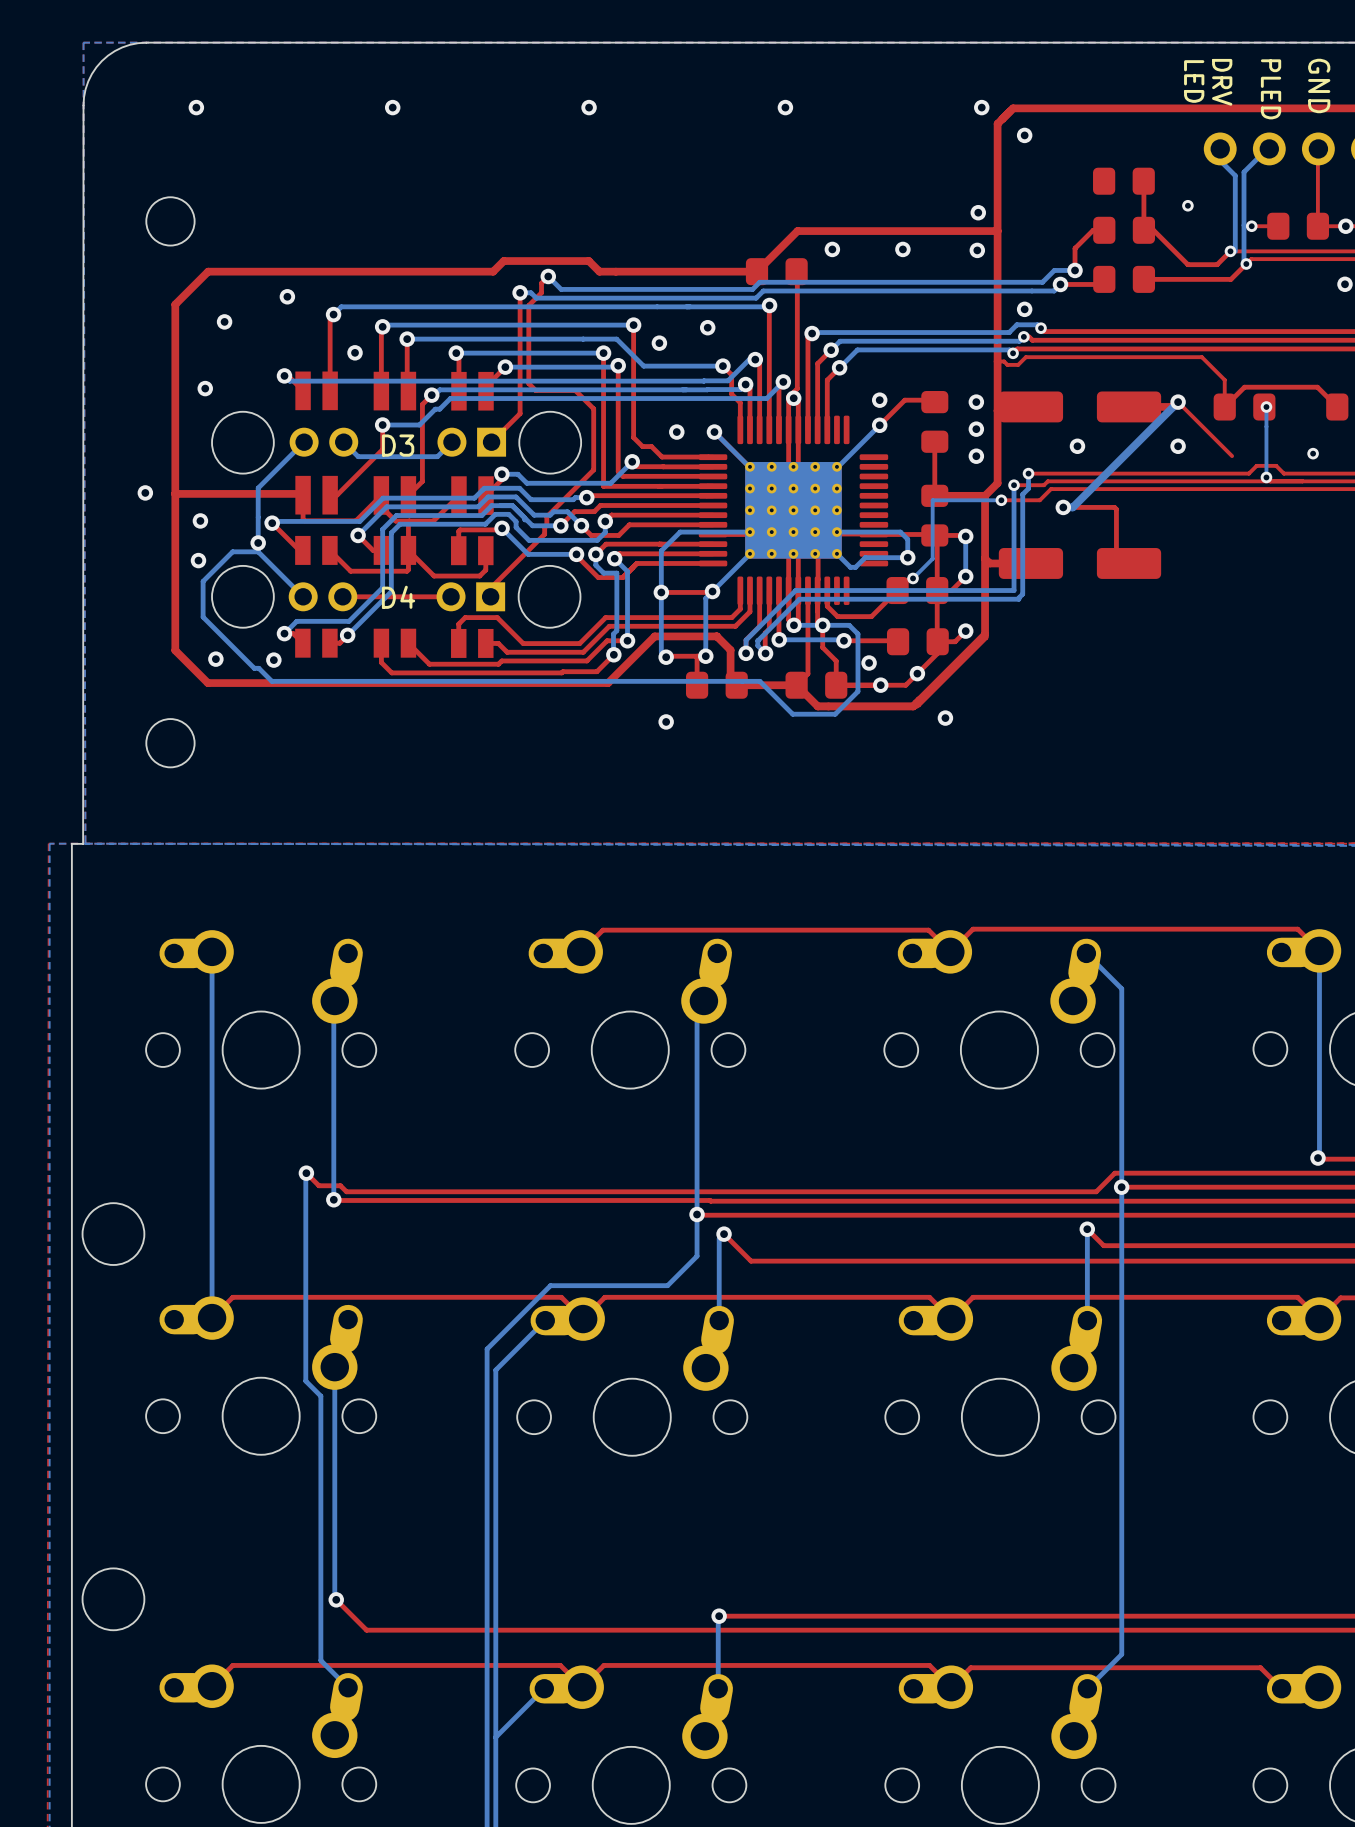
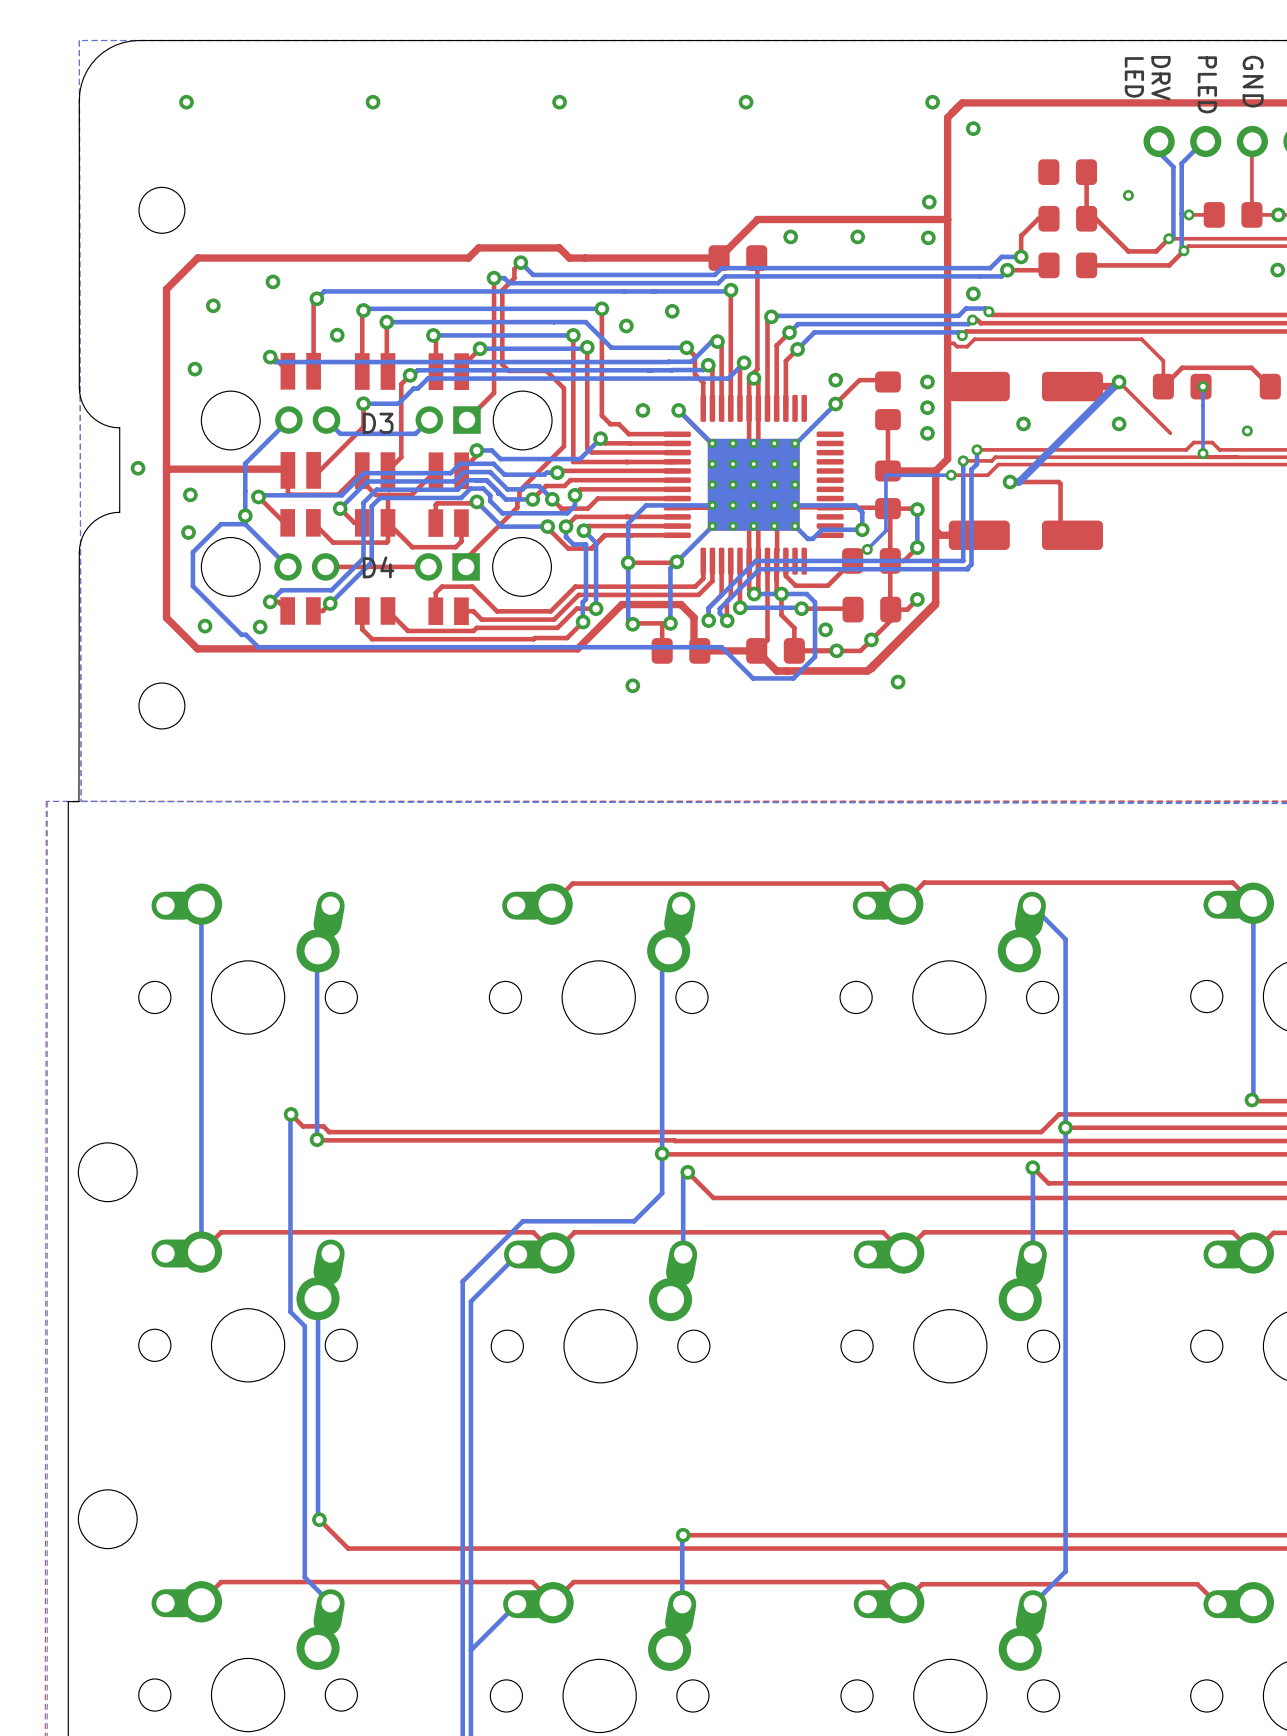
board edge: (83, 105) (83, 843) -> (79, 100) (79, 392) (84, 407) (95, 419) (109, 426) (119, 427) (119, 512) (109, 513) (95, 520) (84, 532) (79, 547) (78, 801)

